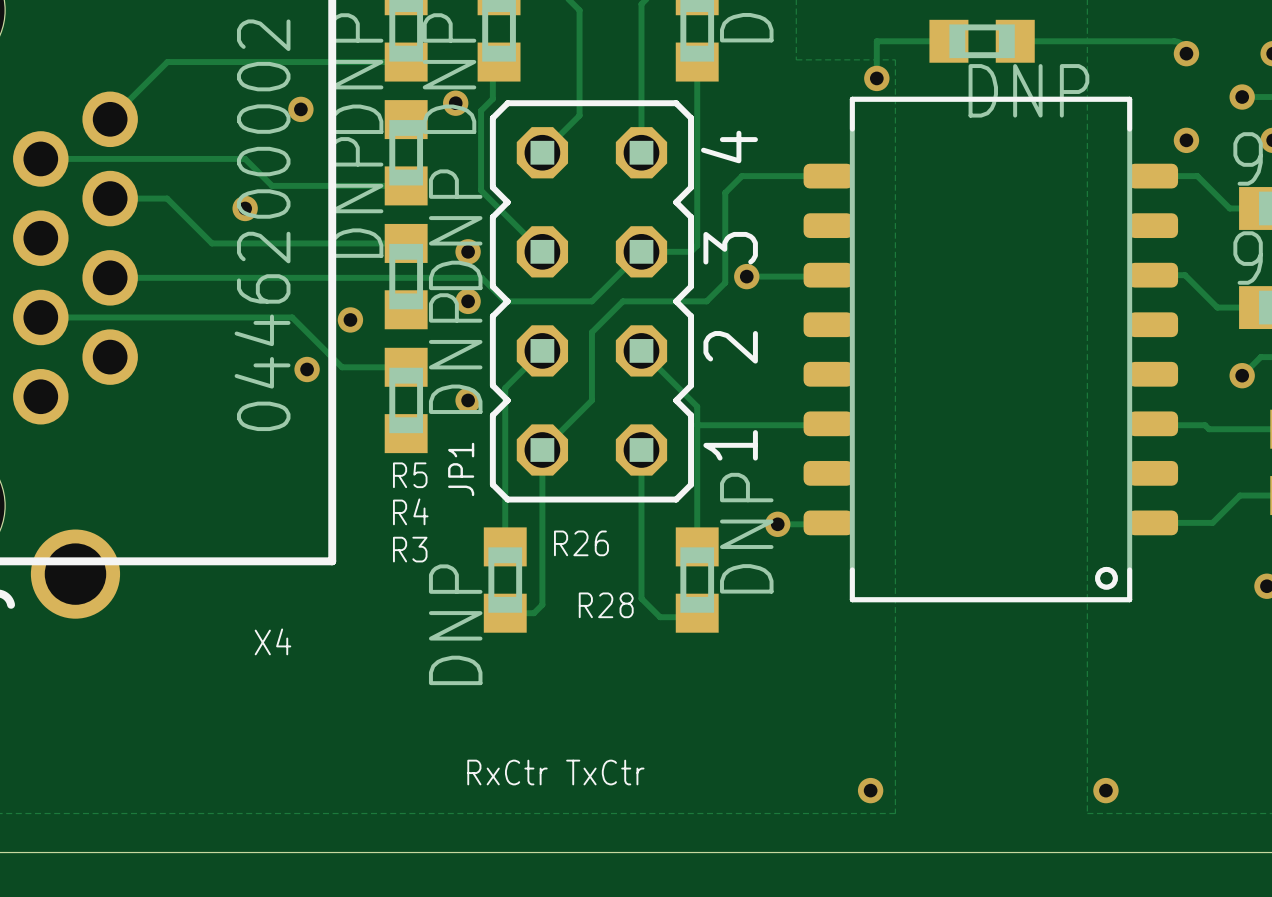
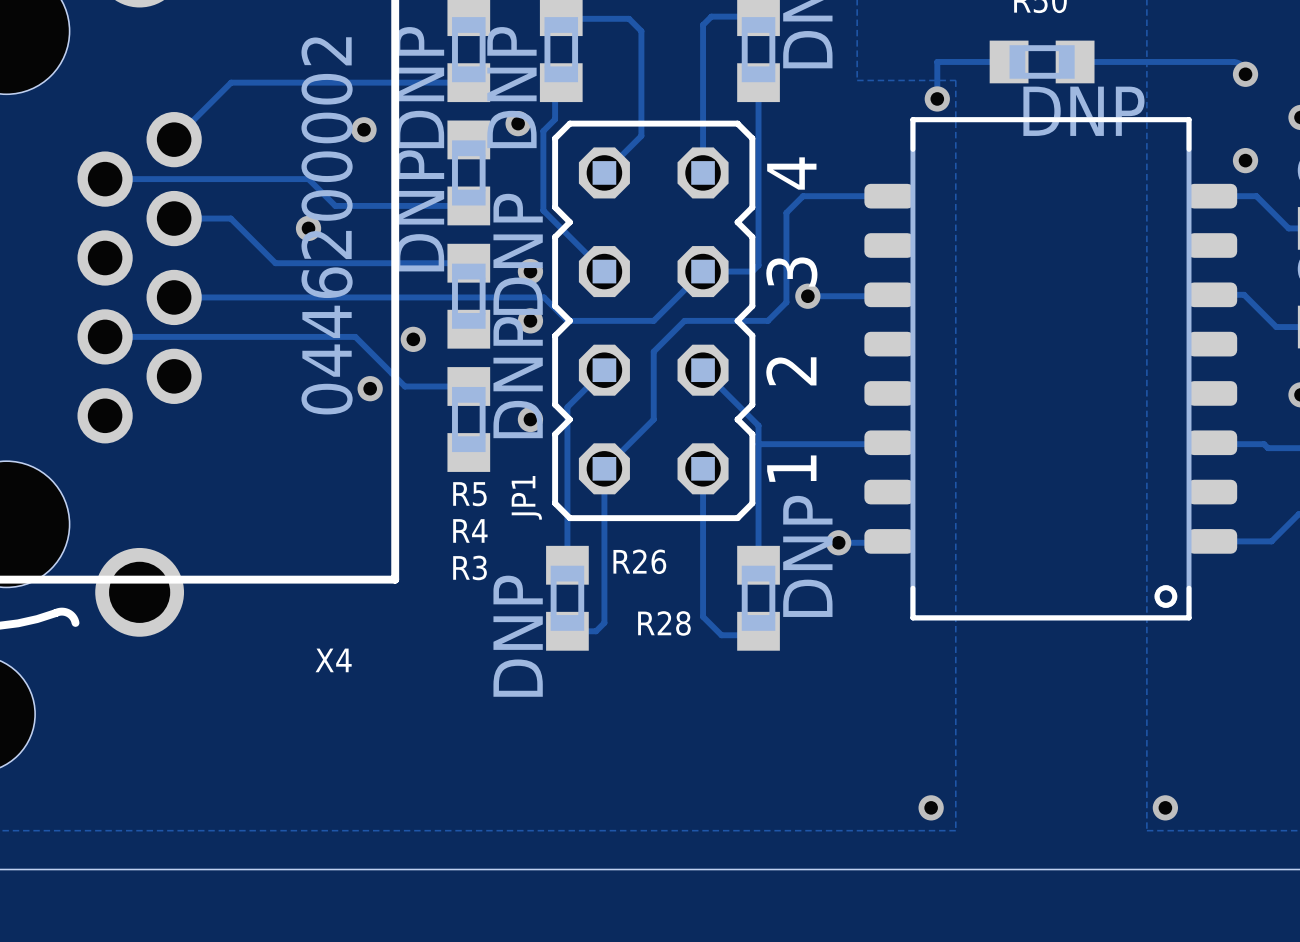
text: RxCtr TxCtr (555, 772) -> none

